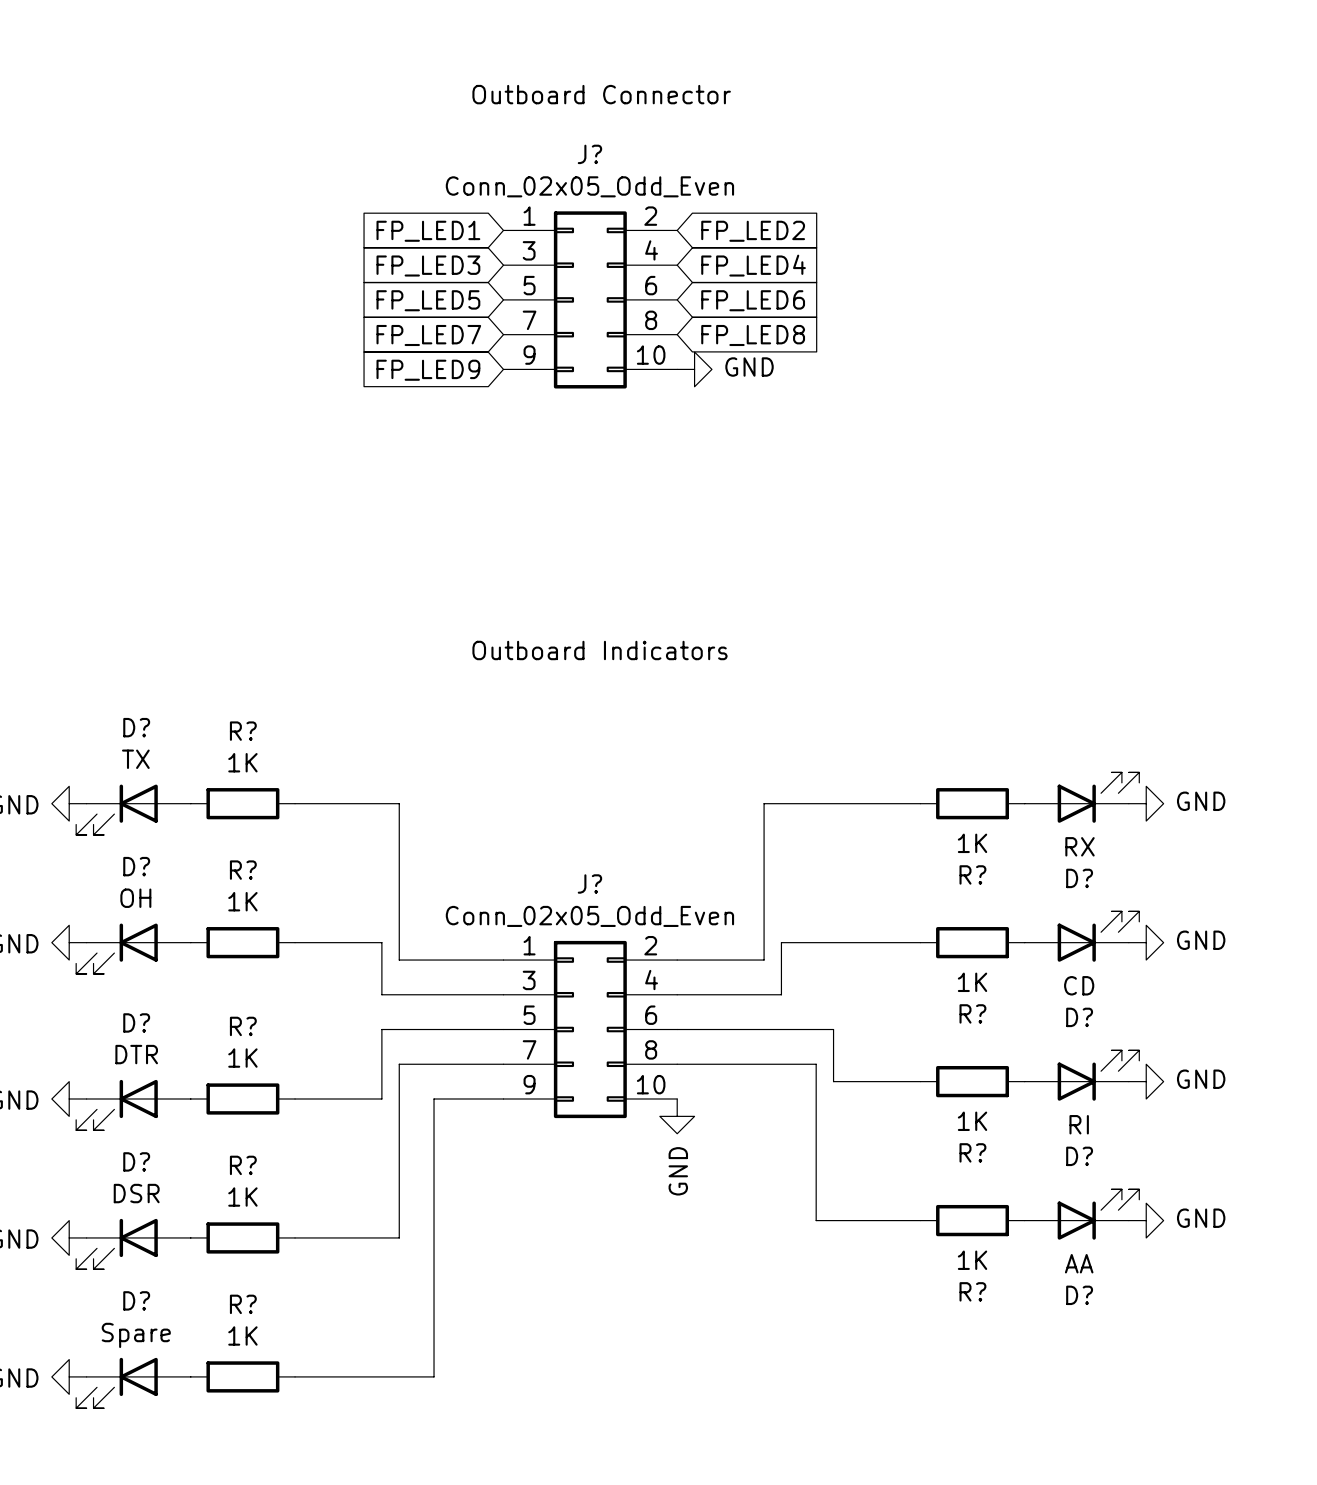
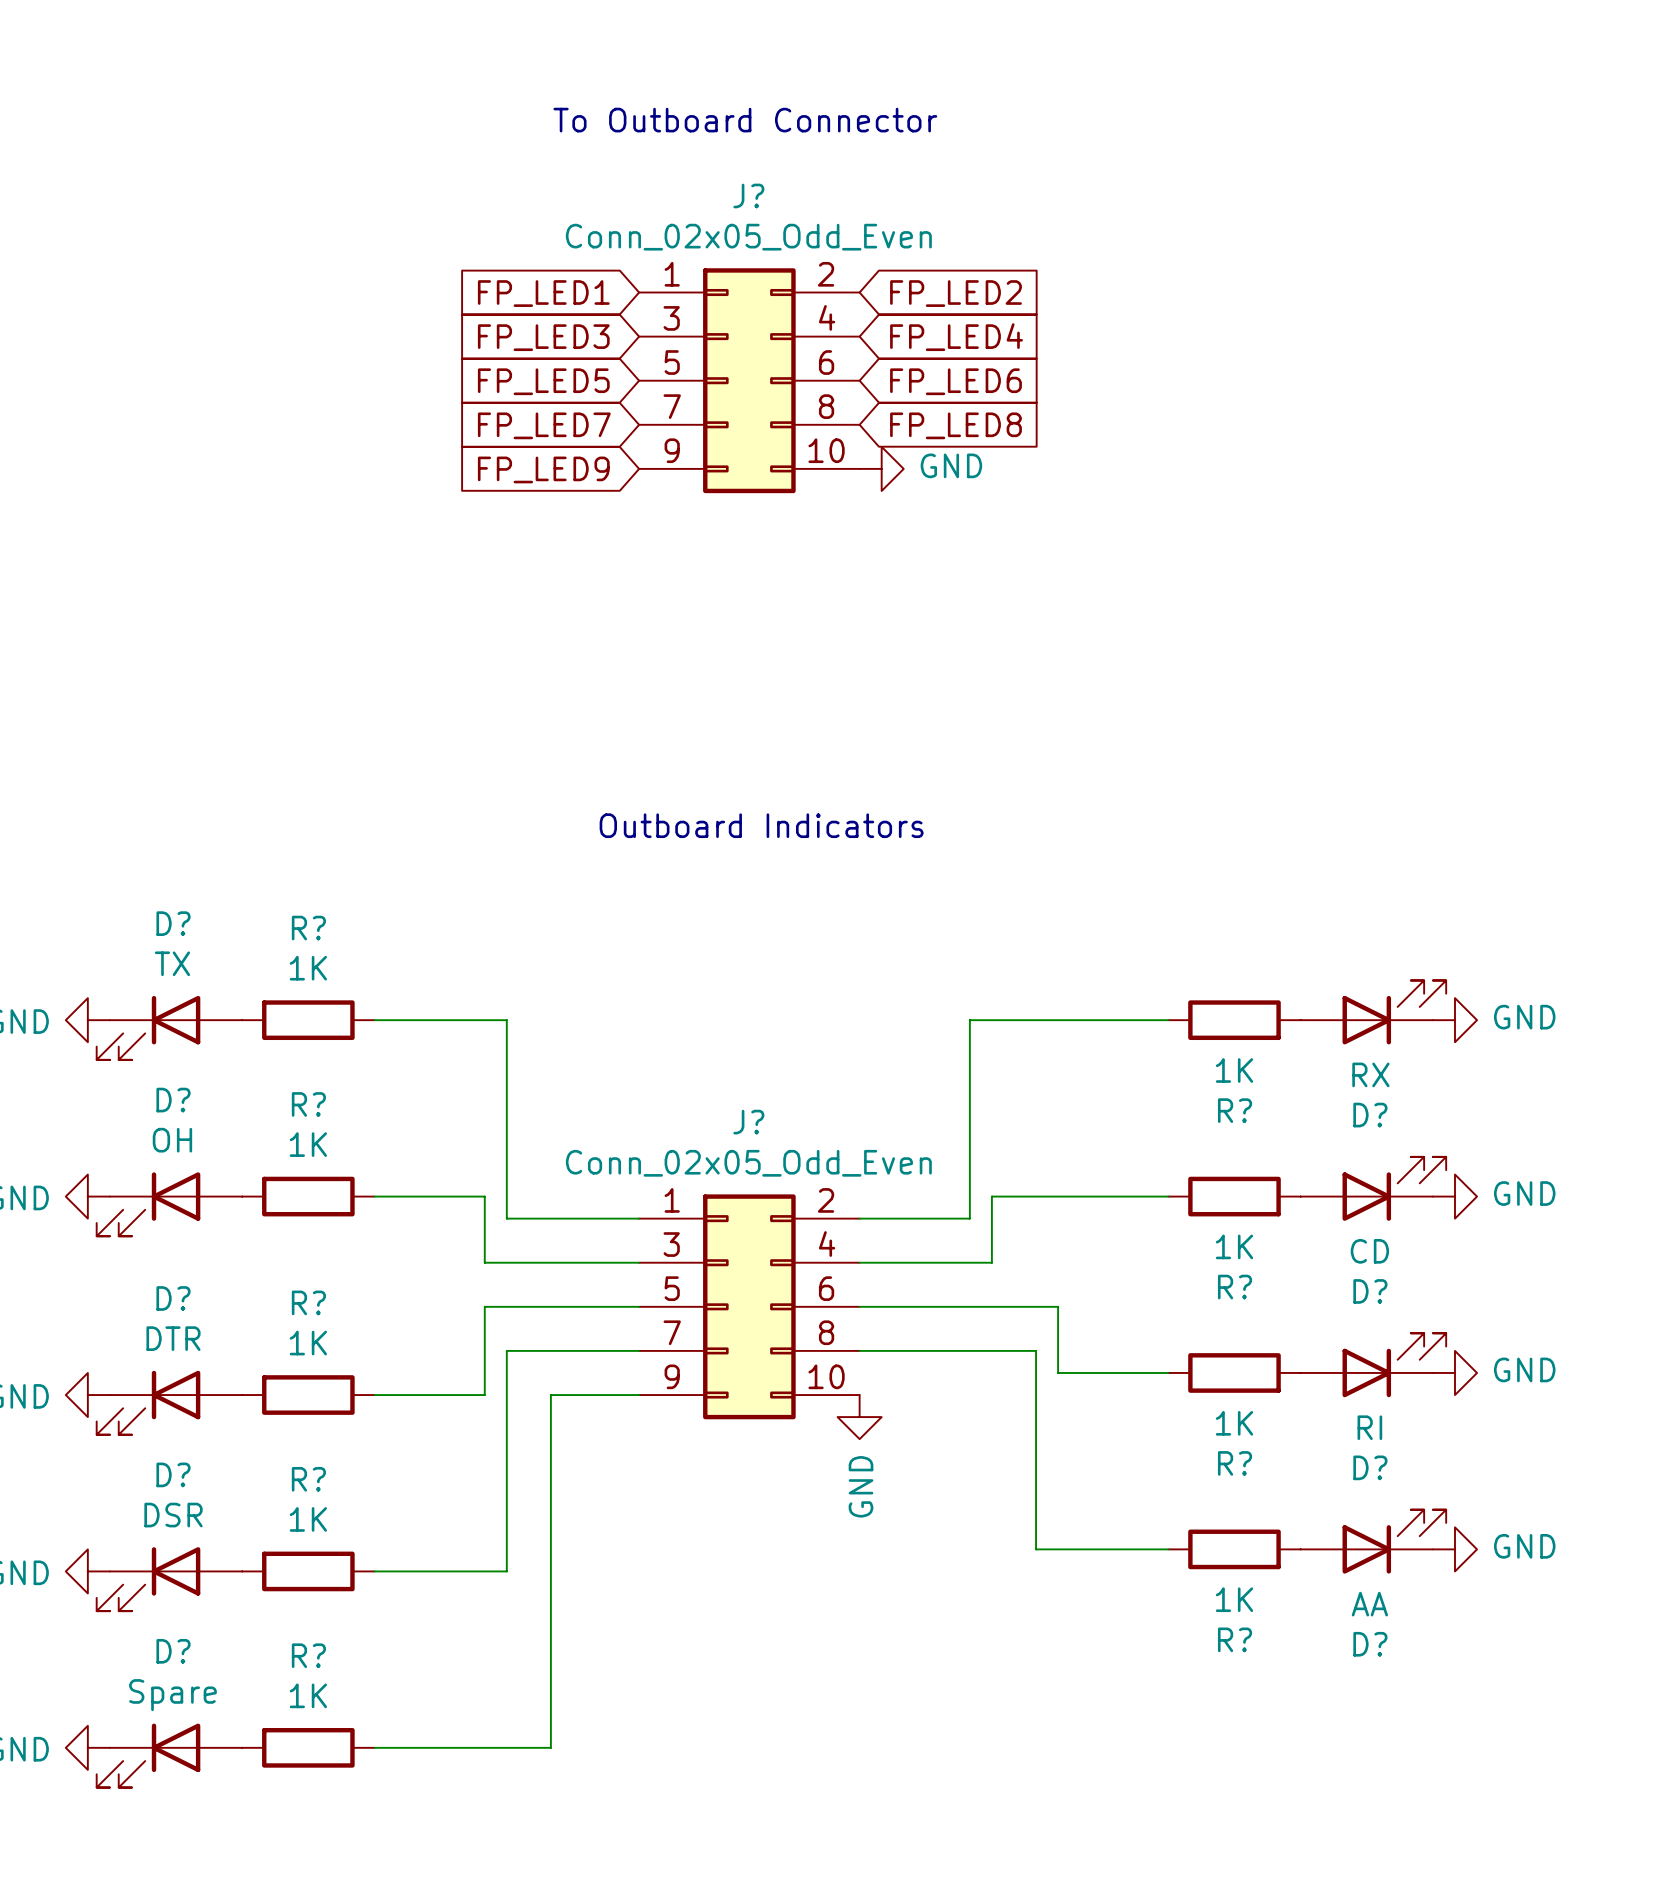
text: Outboard Connector (601, 94) -> To Outboard Connector (745, 120)

